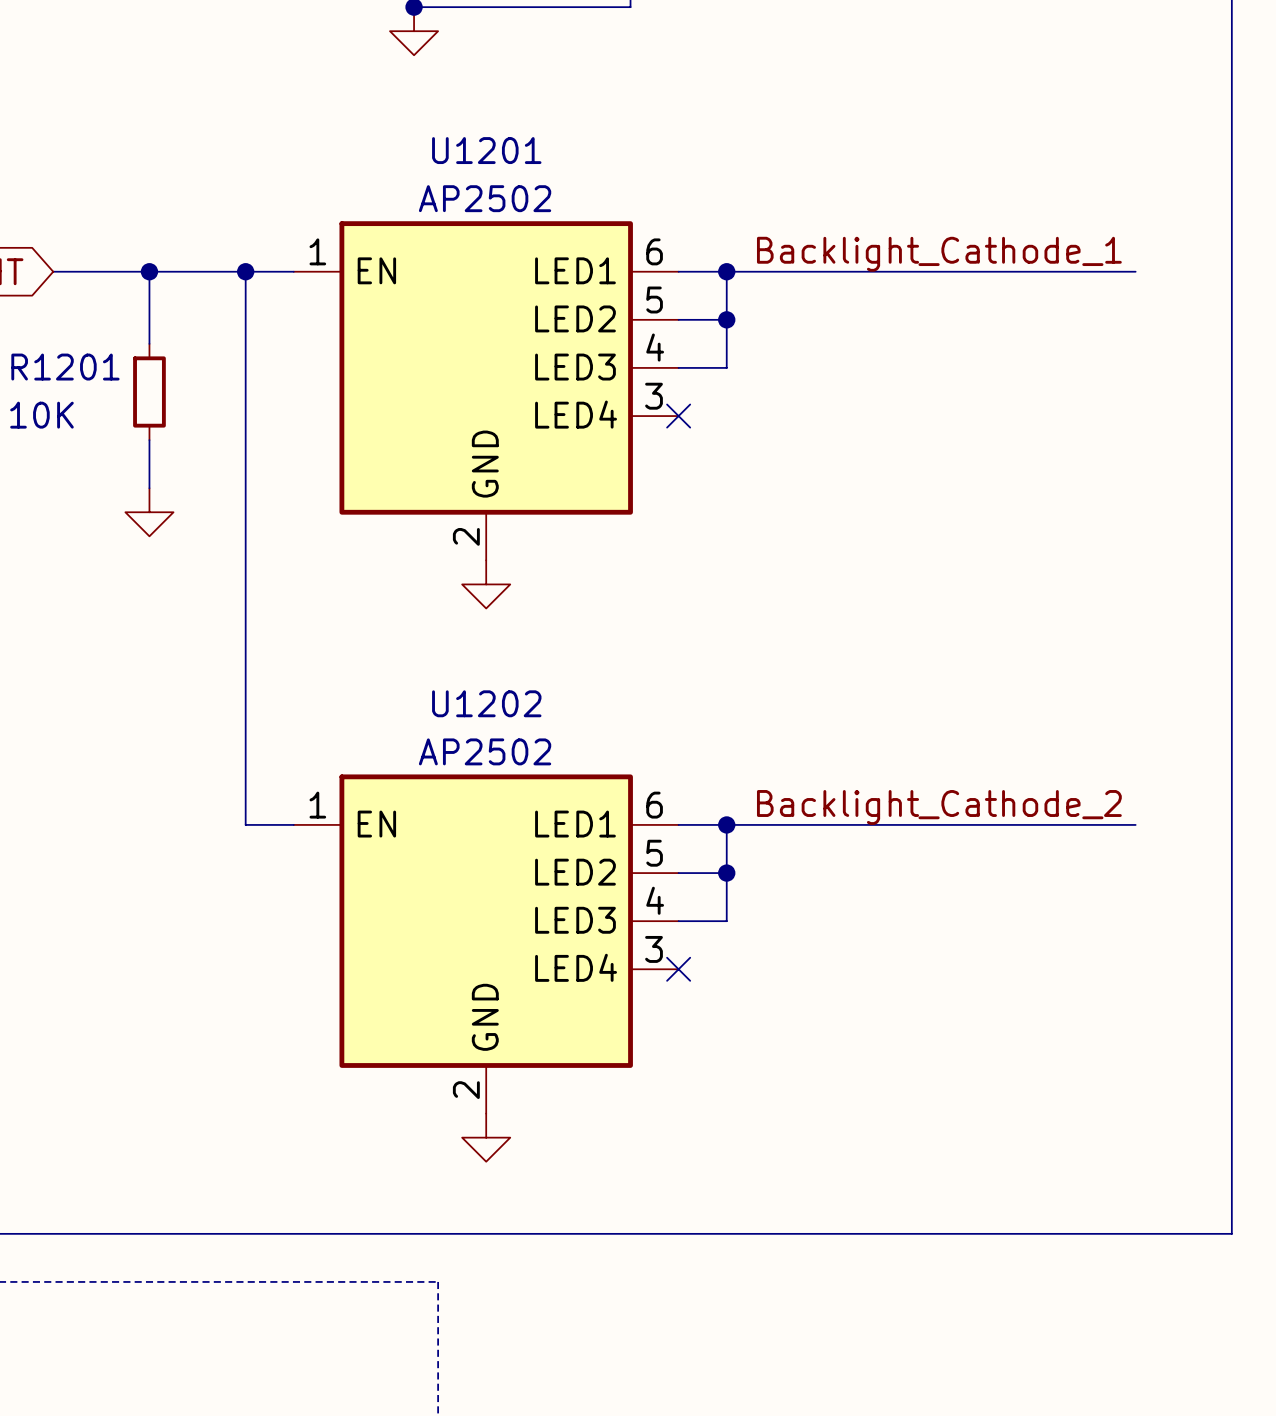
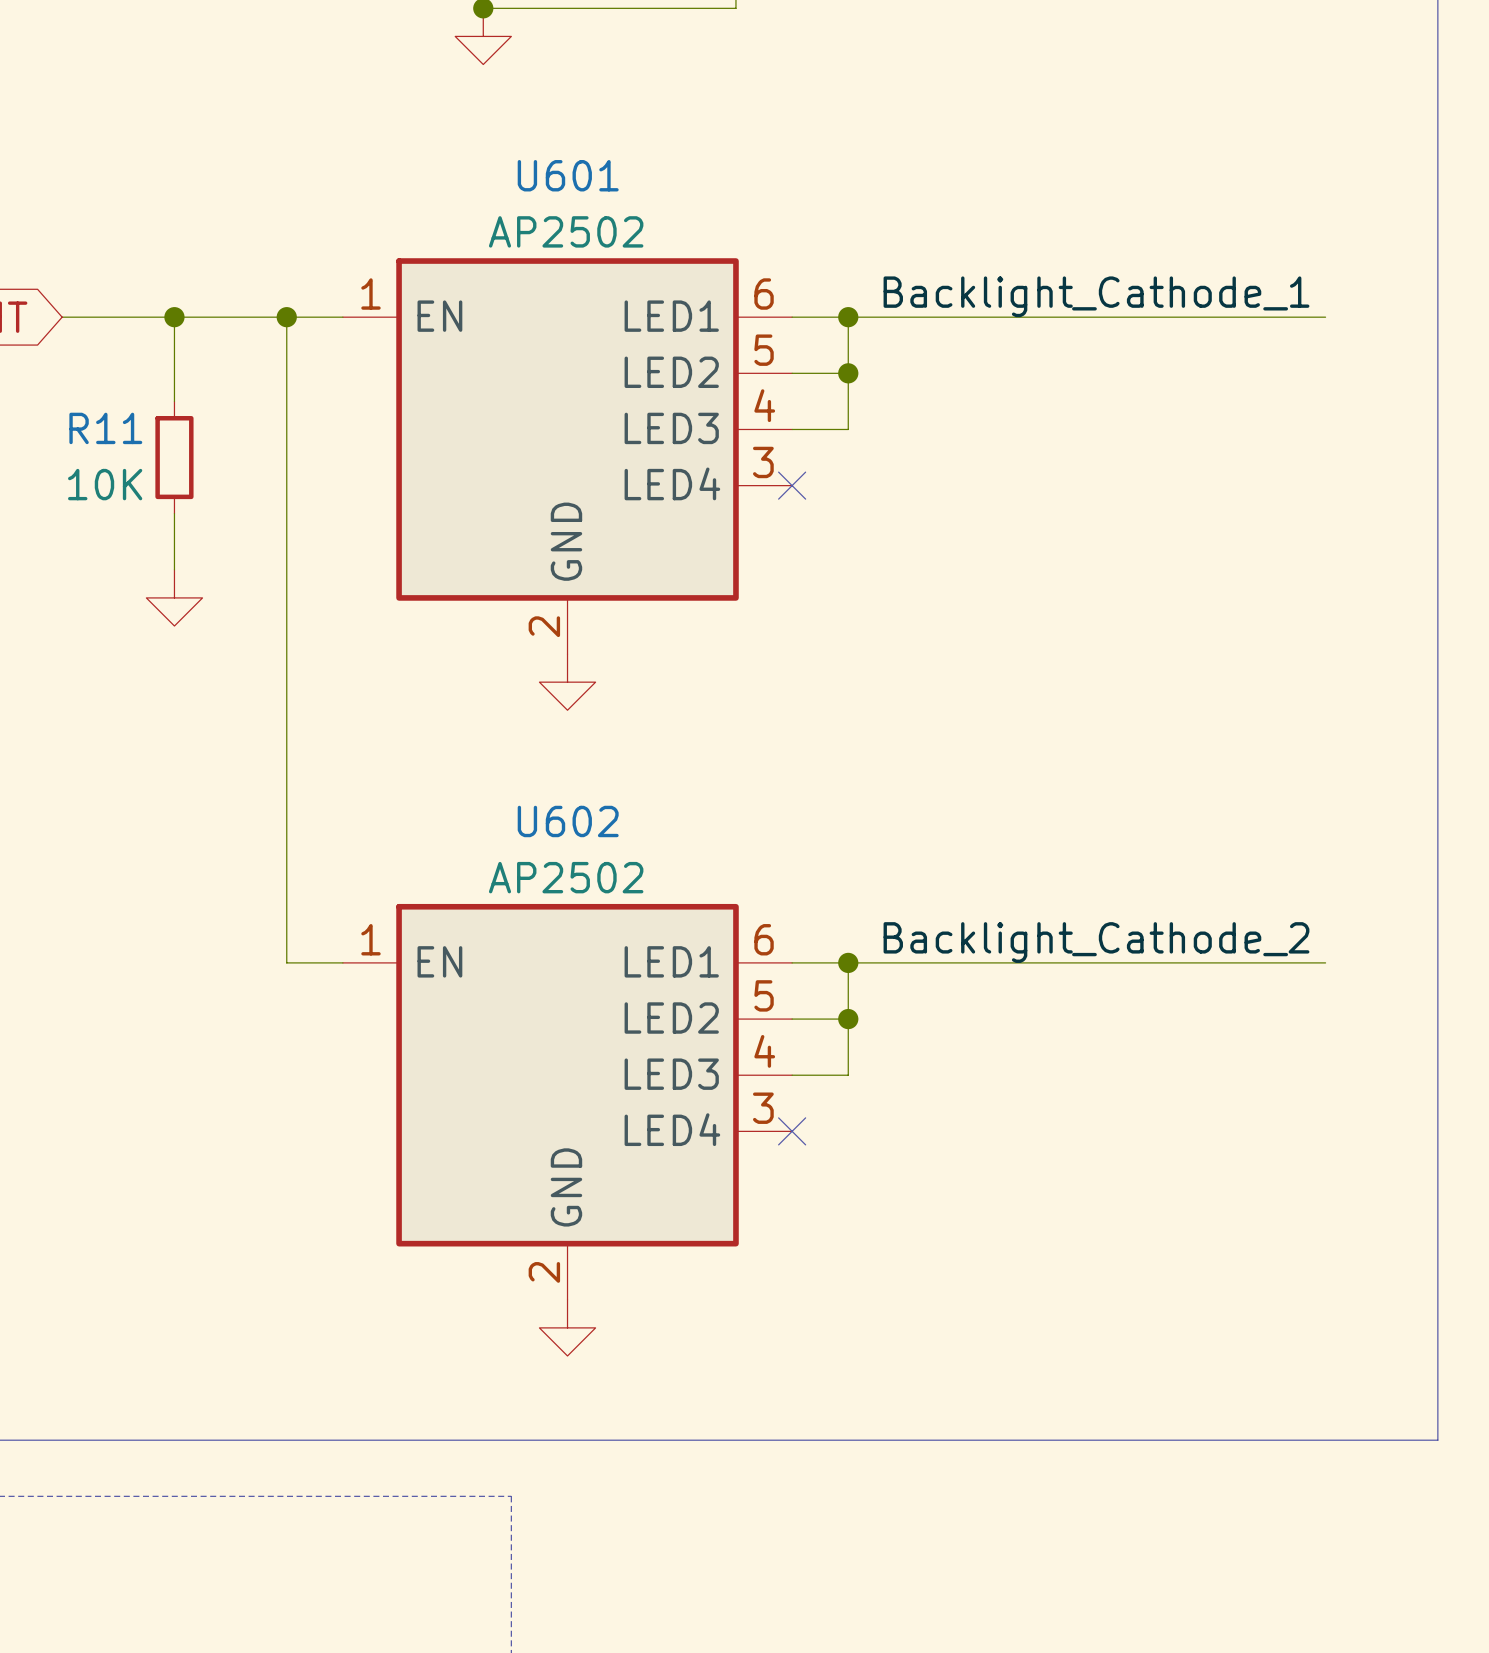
U1201 name: U1201 (486, 150) -> U601 (568, 175)
R1201 name: R1201 (65, 367) -> R11 (105, 428)
R1201 value position: 10K (41, 415) -> 10K (105, 484)
U1202 name: U1202 (486, 703) -> U602 (568, 821)

